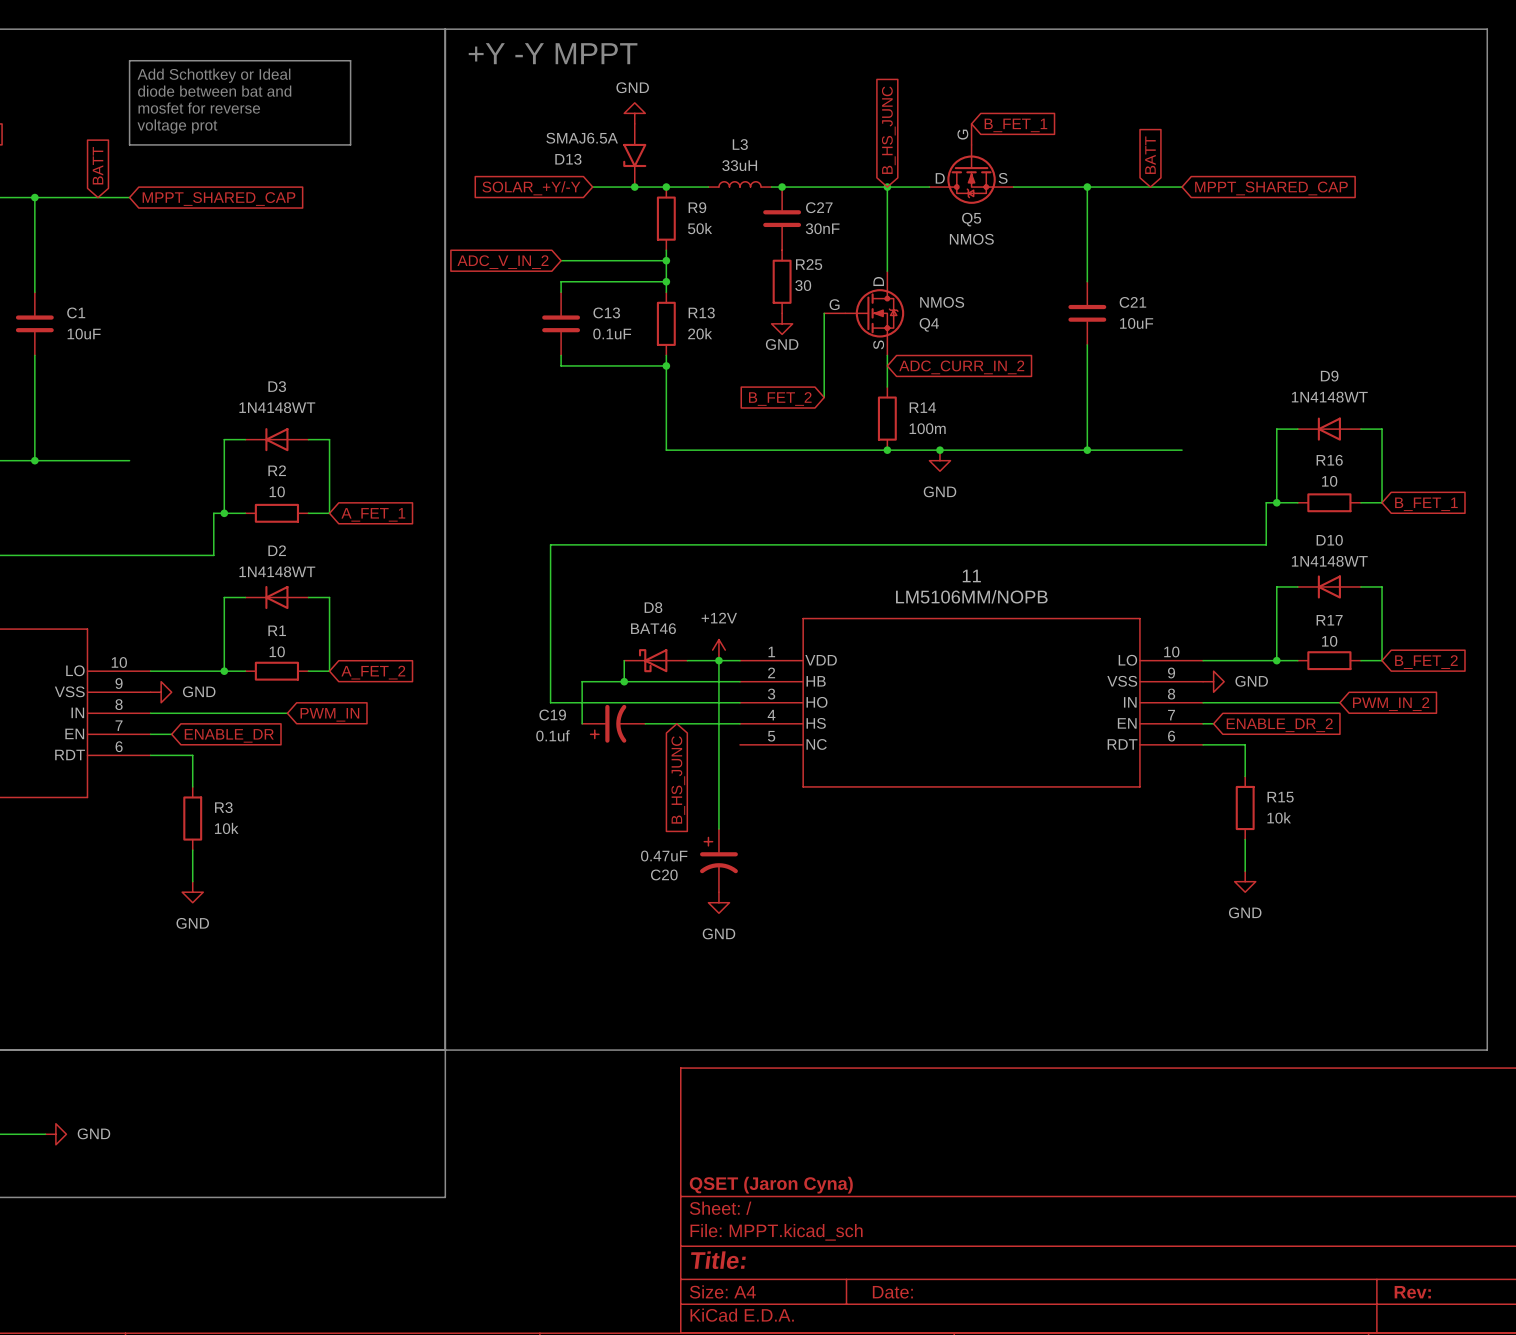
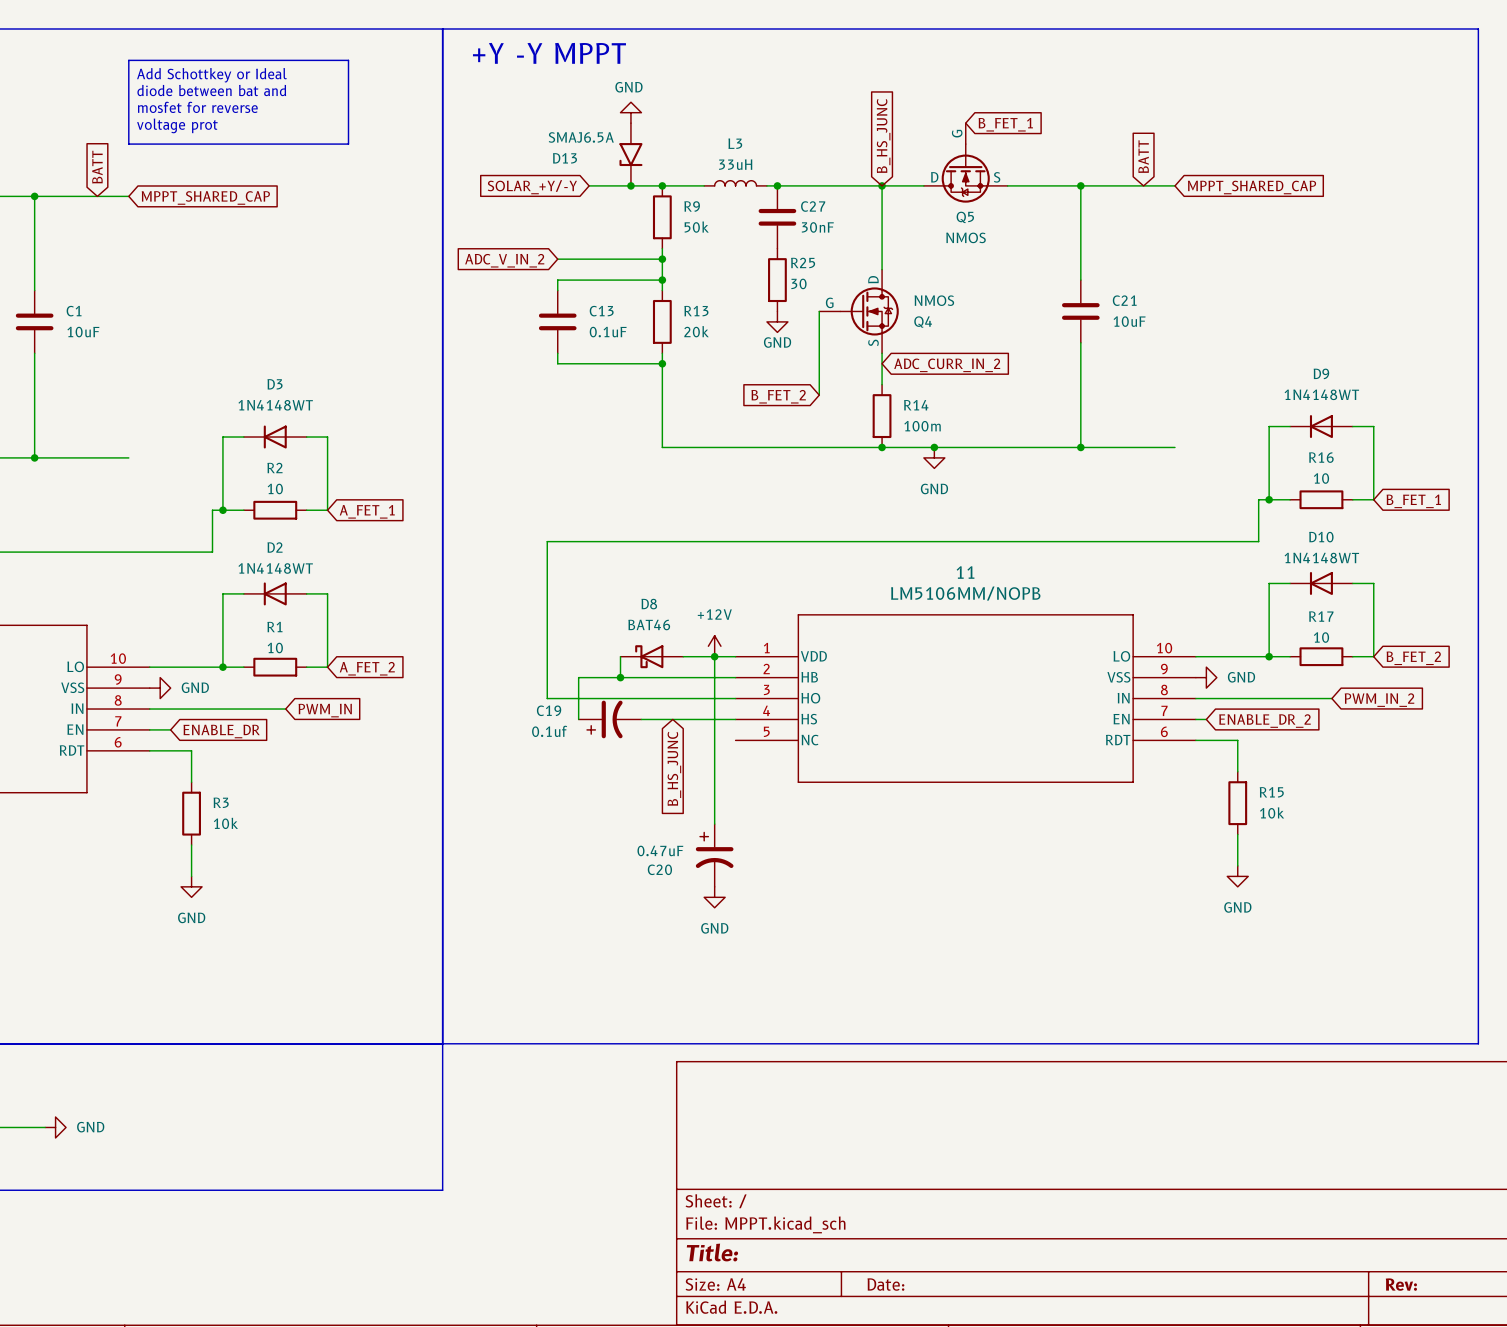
title block: QSET (Jaron Cyna) (771, 1185) -> none

